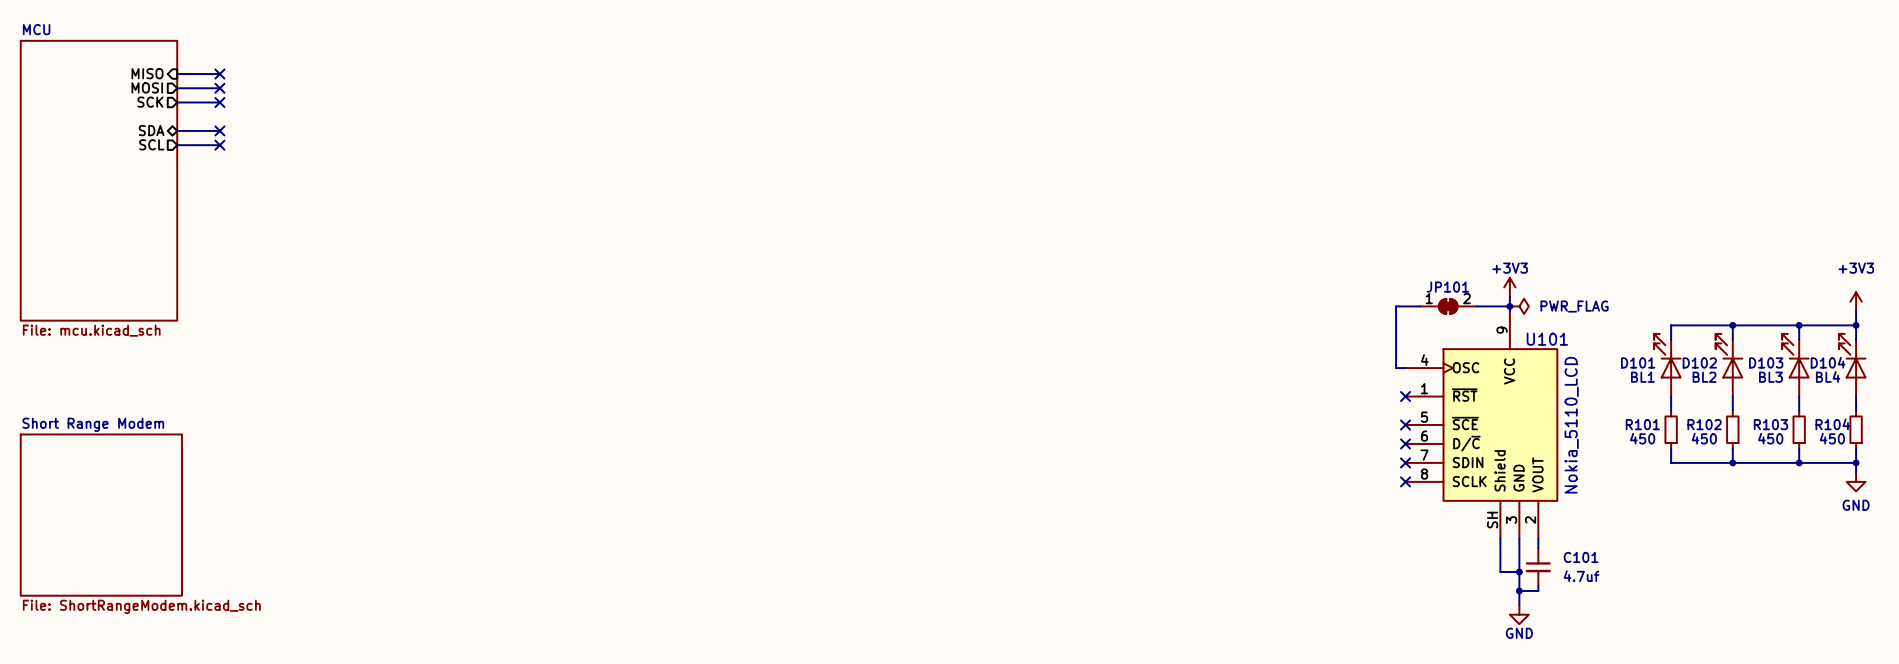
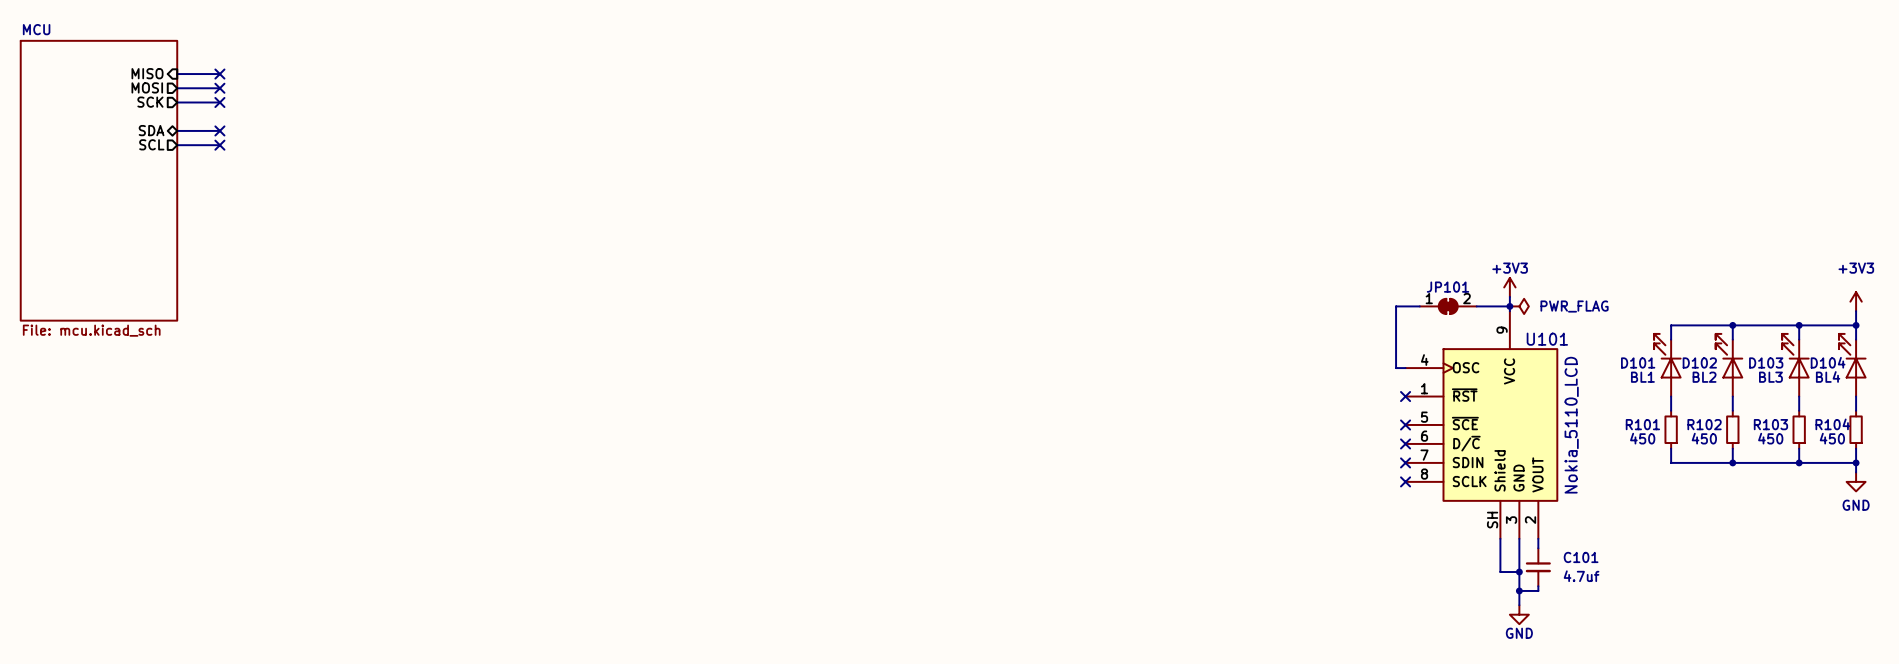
sheet Short Range Modem: File: ShortRangeModem.kicad_sch (101, 515) -> none

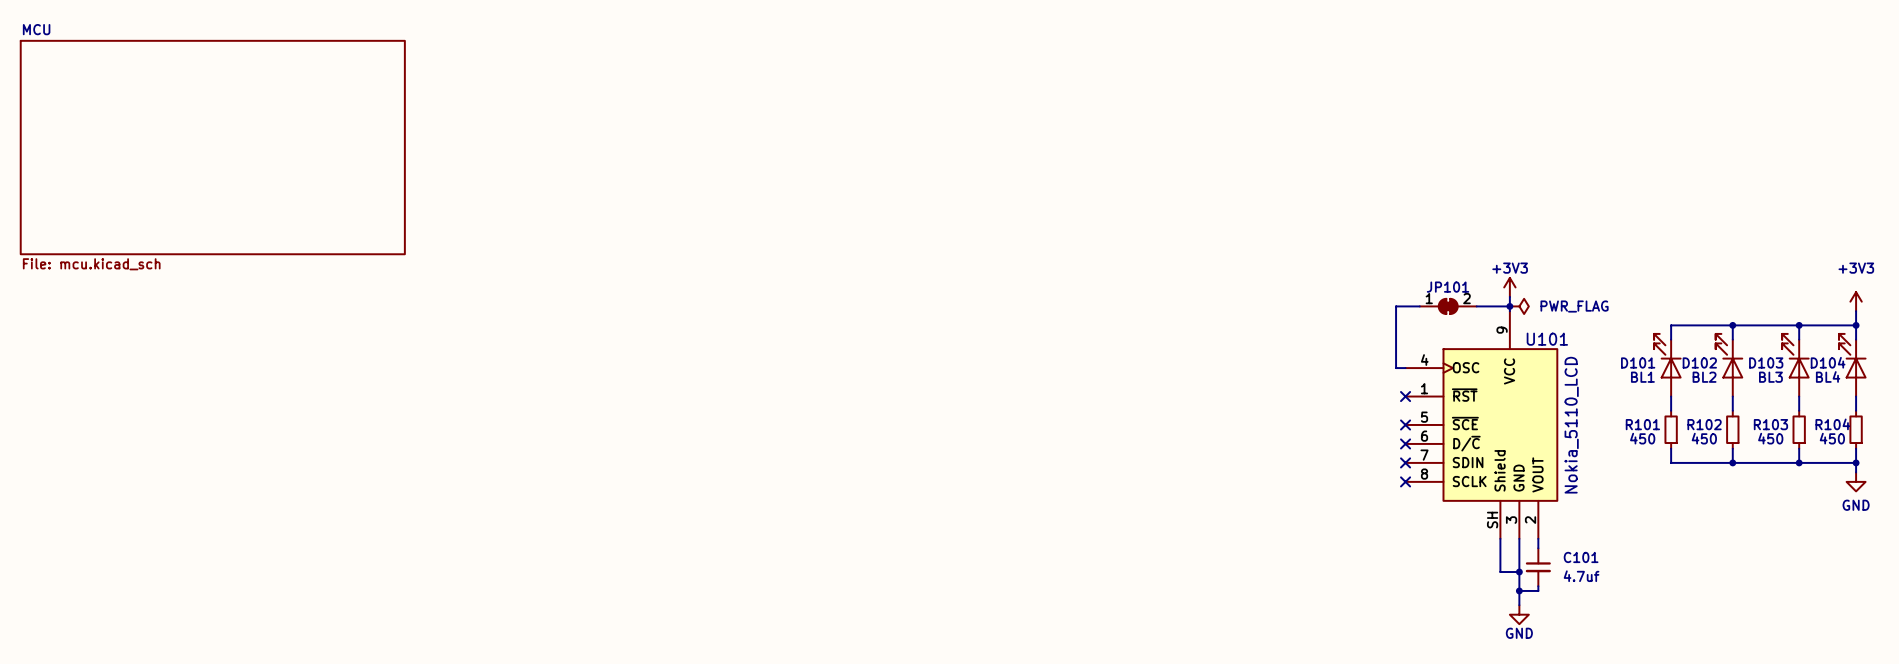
sheet pin: MISO (147, 73) -> none
wire: (177, 74) (219, 74) -> none
no-connect mark: (219, 74) -> none
sheet pin: MOSI (147, 87) -> none
wire: (177, 88) (219, 88) -> none
no-connect mark: (219, 88) -> none
sheet pin: SCK (150, 102) -> none
wire: (177, 102) (219, 102) -> none
no-connect mark: (219, 102) -> none
sheet pin: SDA (151, 130) -> none
wire: (177, 130) (219, 130) -> none
no-connect mark: (219, 130) -> none
sheet pin: SCL (151, 144) -> none
wire: (177, 145) (219, 145) -> none
no-connect mark: (219, 145) -> none
sheet MCU: none -> File: mcu.kicad_sch (212, 147)
sheet MCU: File: mcu.kicad_sch (98, 180) -> none

